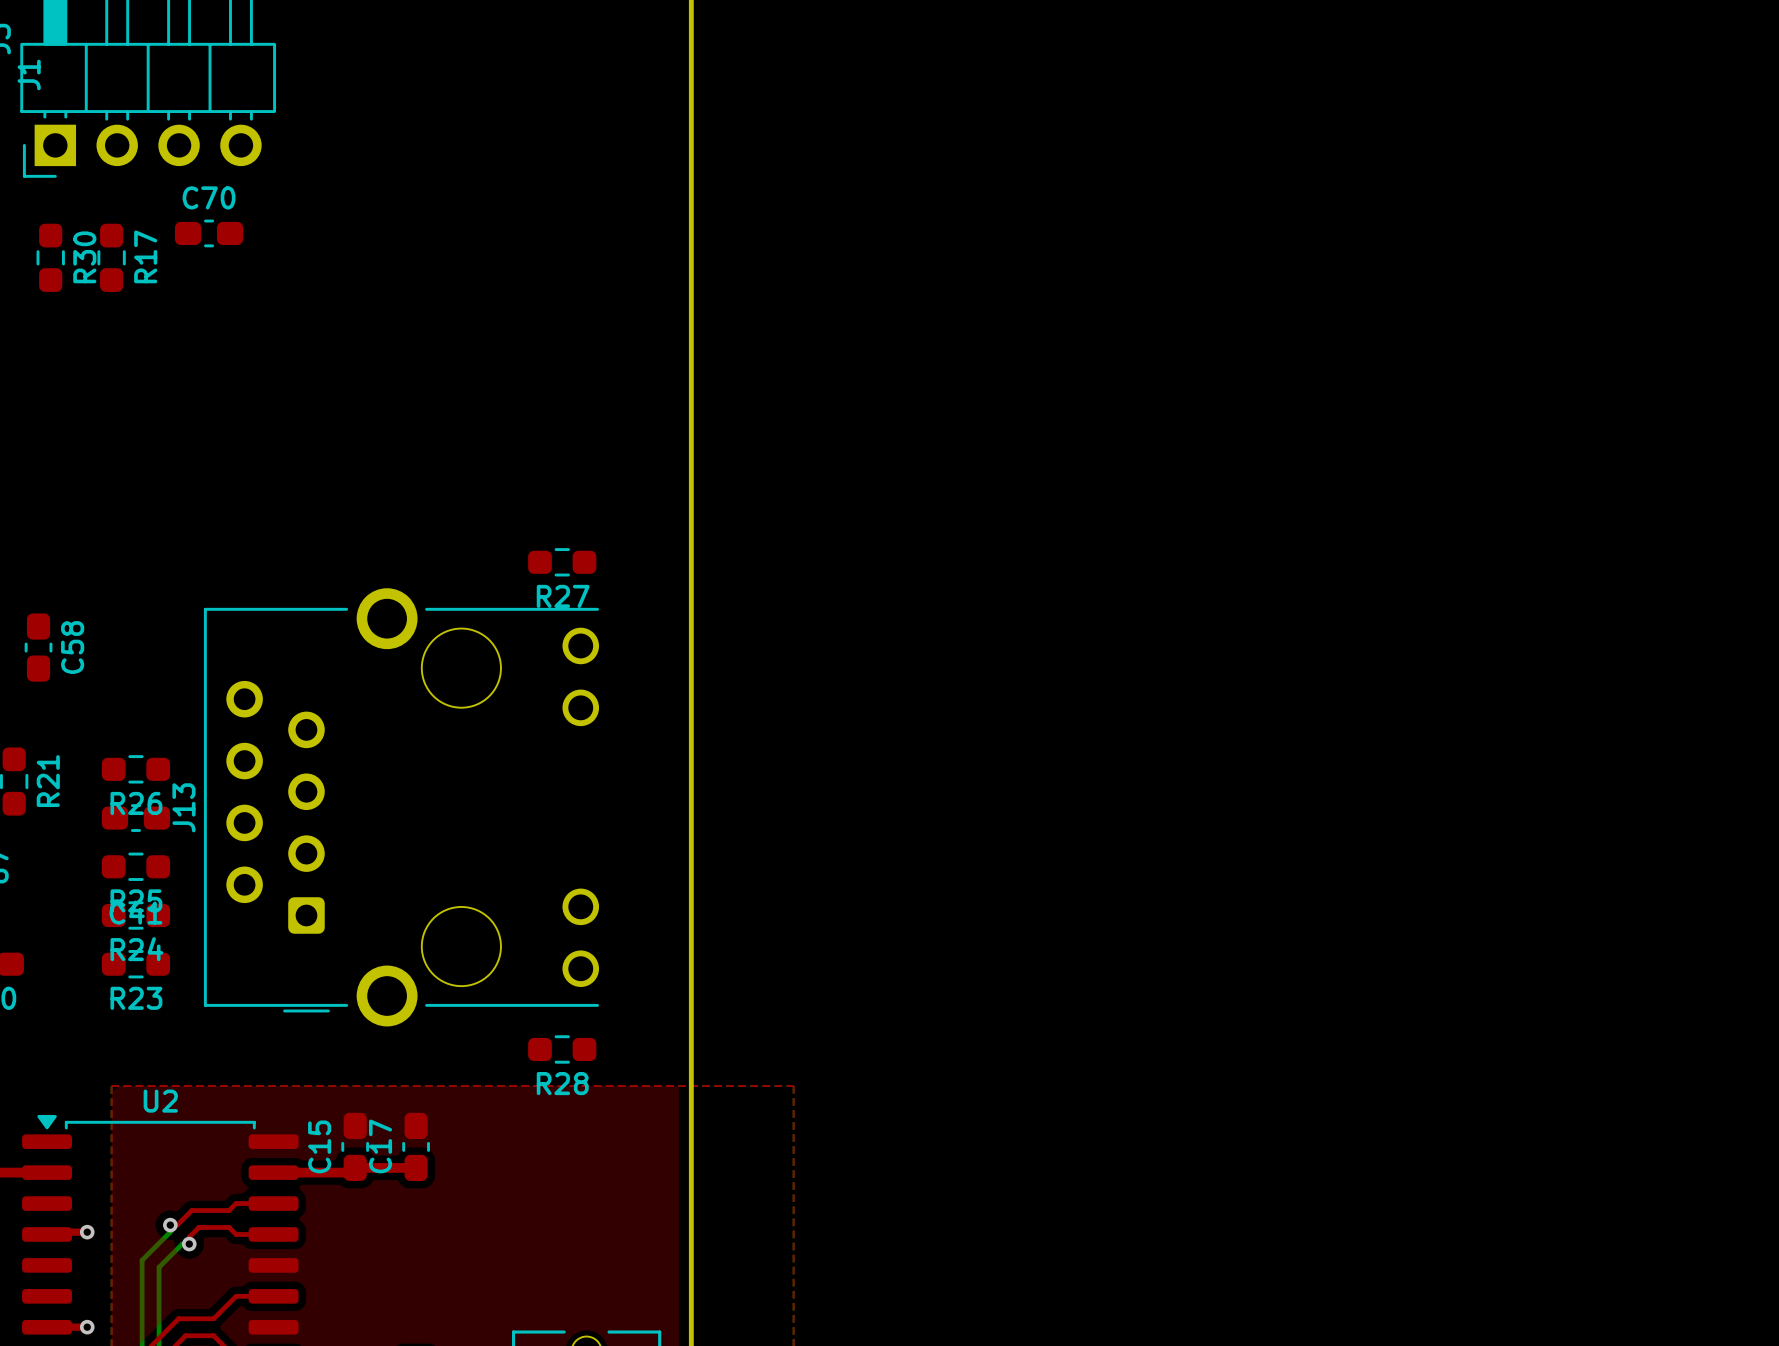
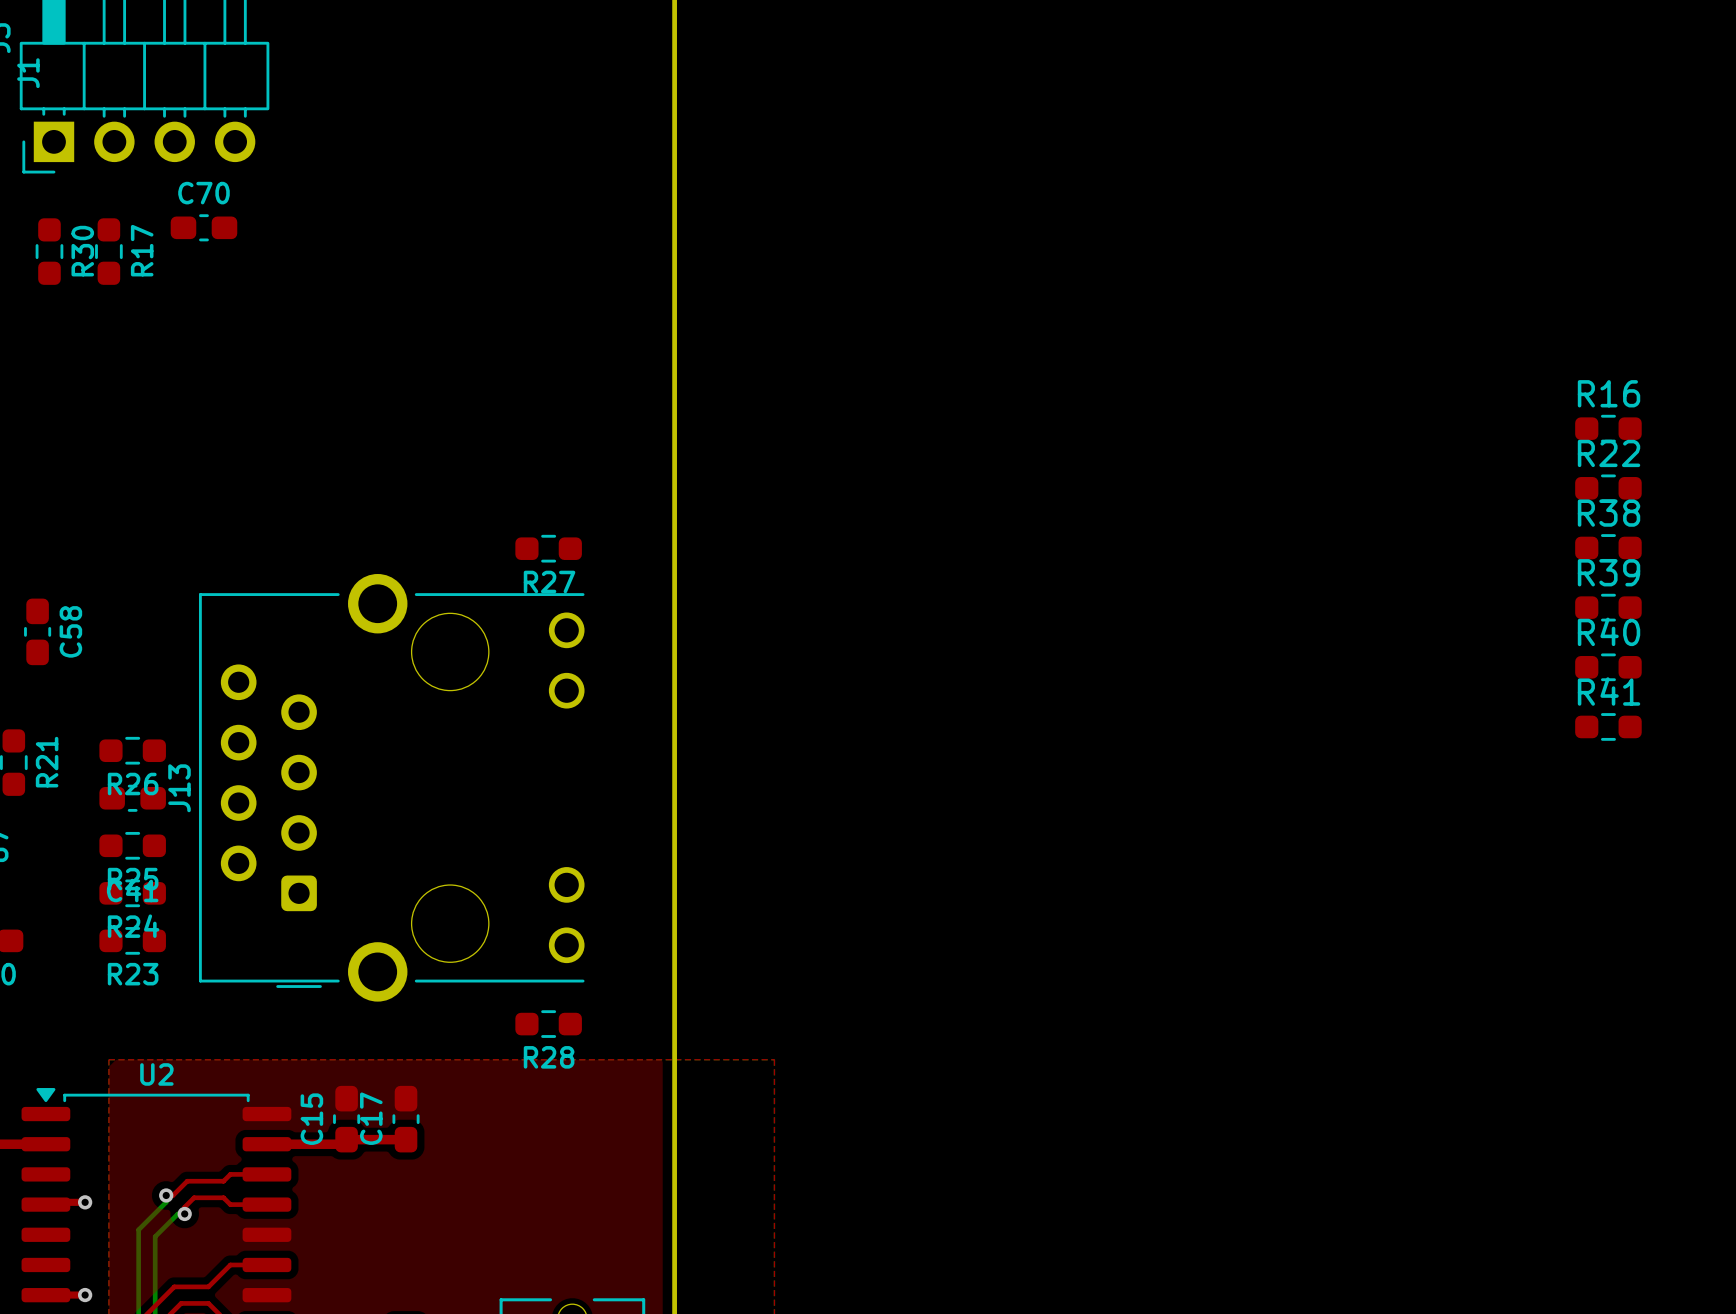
R16: none -> (1608, 428)
R22: none -> (1608, 488)
R38: none -> (1608, 547)
R39: none -> (1608, 607)
R40: none -> (1608, 667)
R41: none -> (1608, 726)

